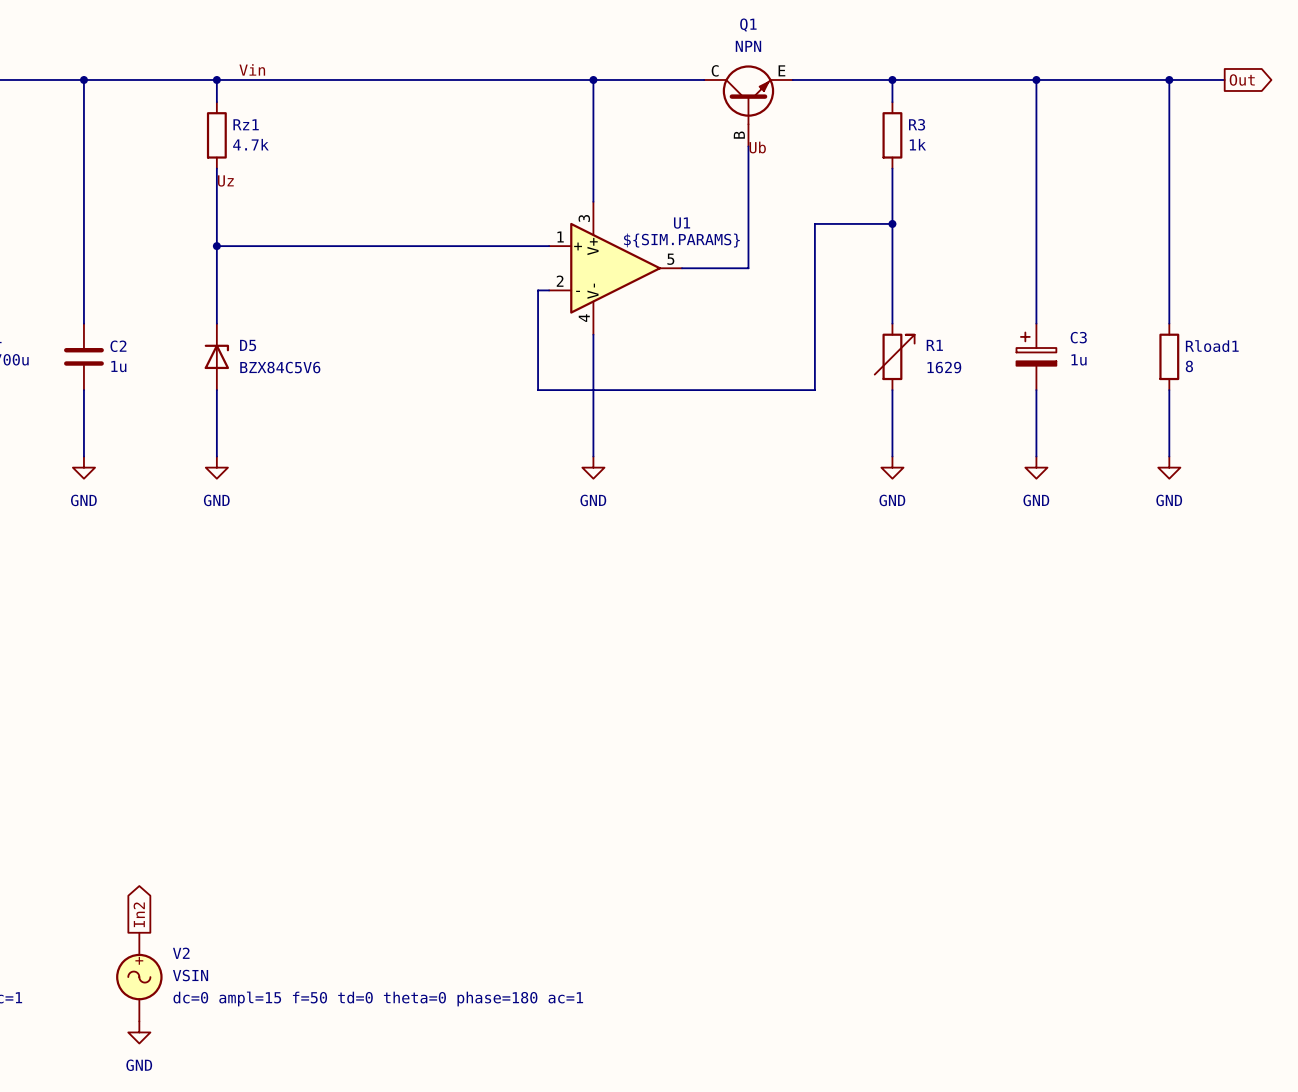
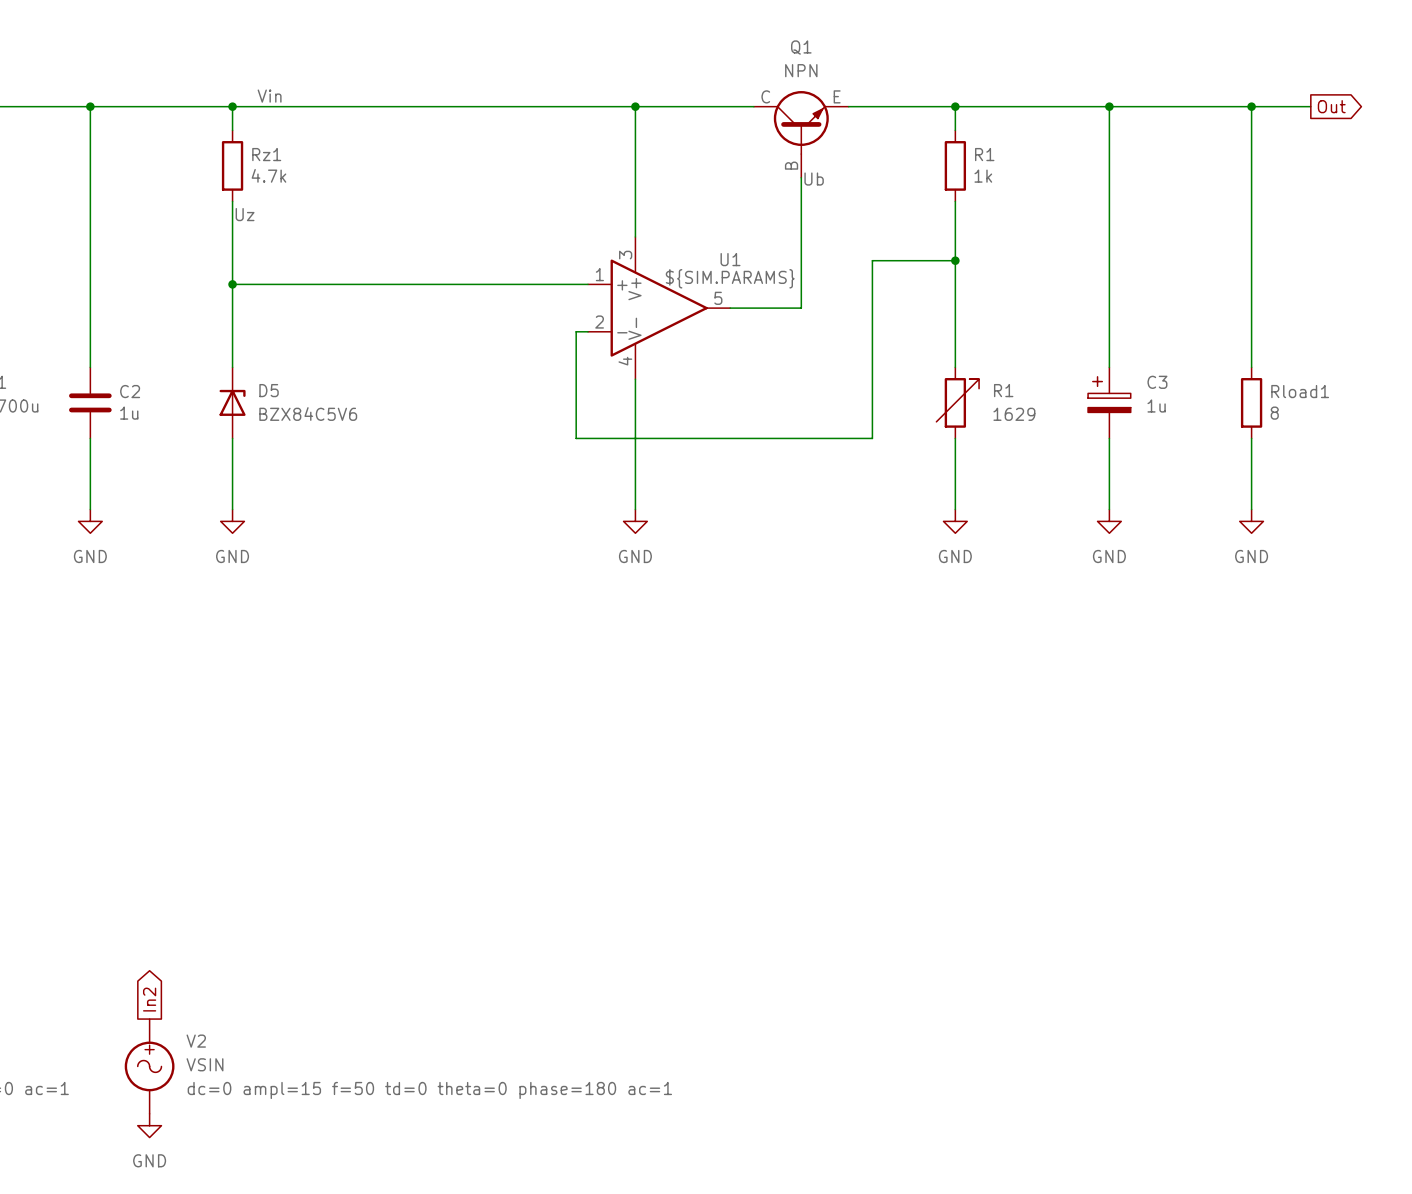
R3 name: R3 (917, 124) -> R1 (984, 154)

